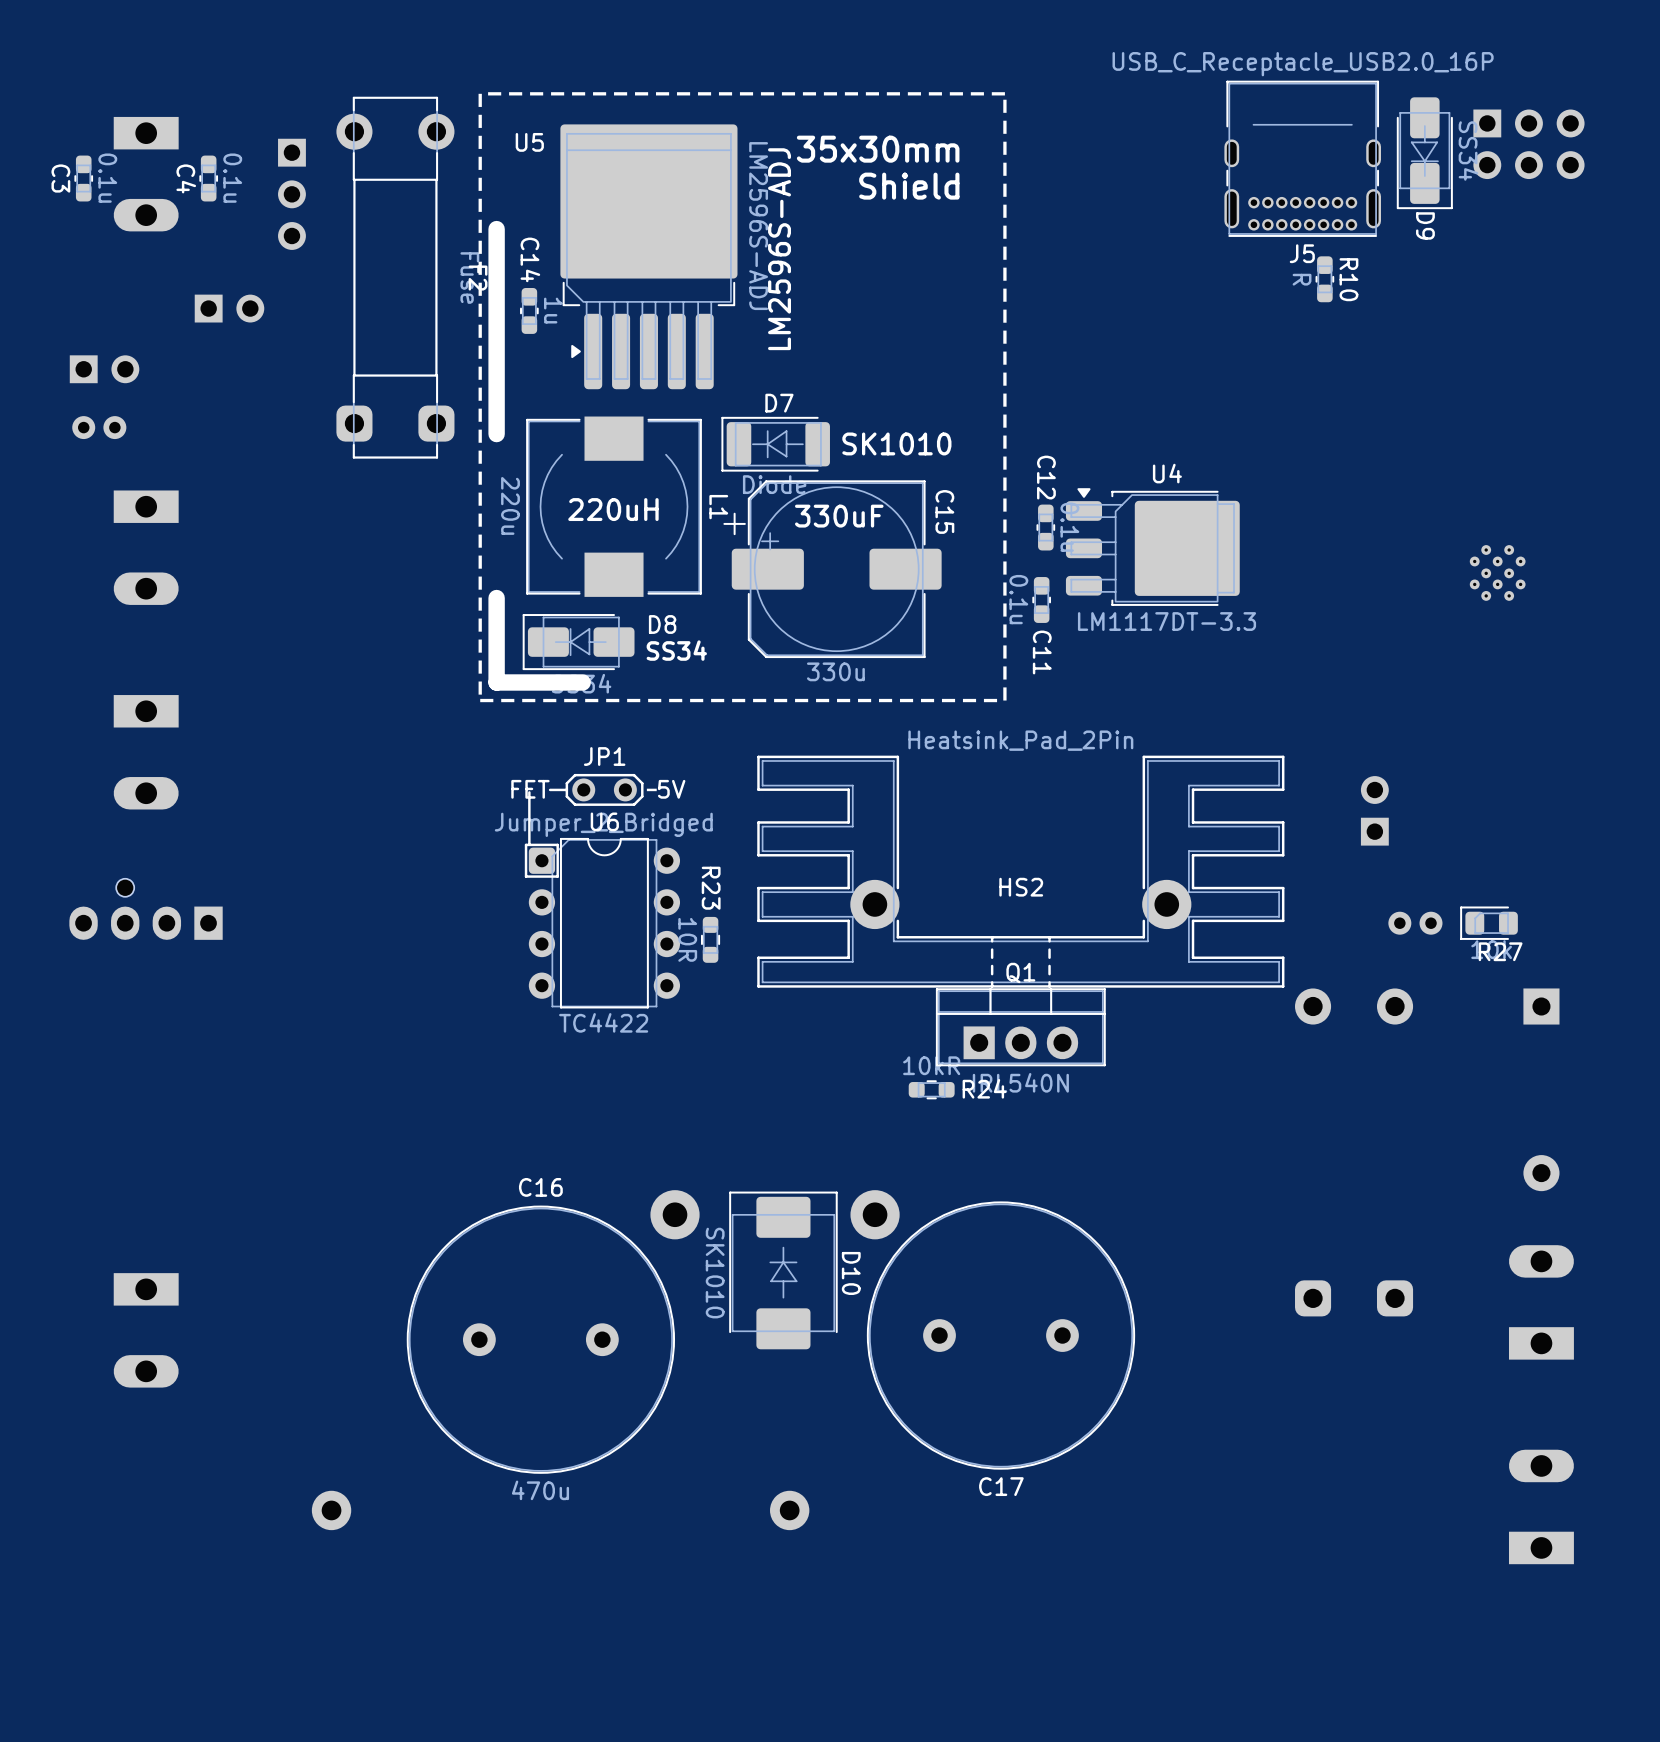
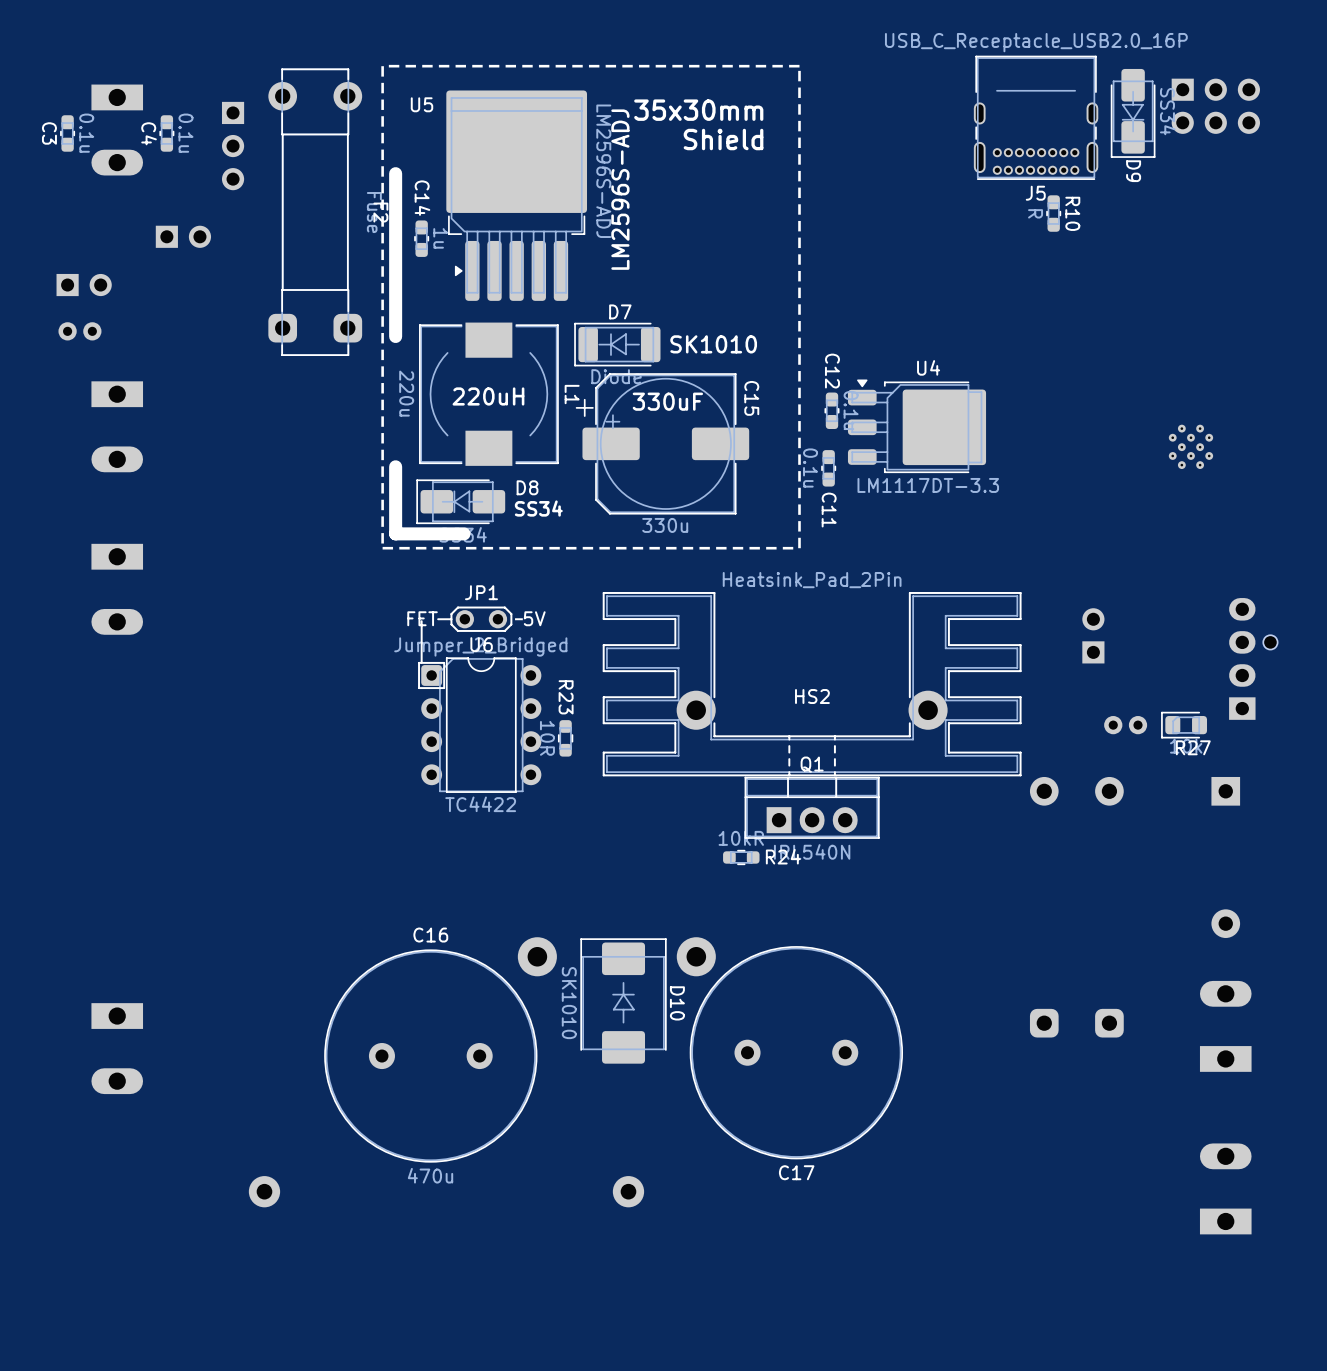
part: none -> (1253, 658)
part: (146, 909) -> none

